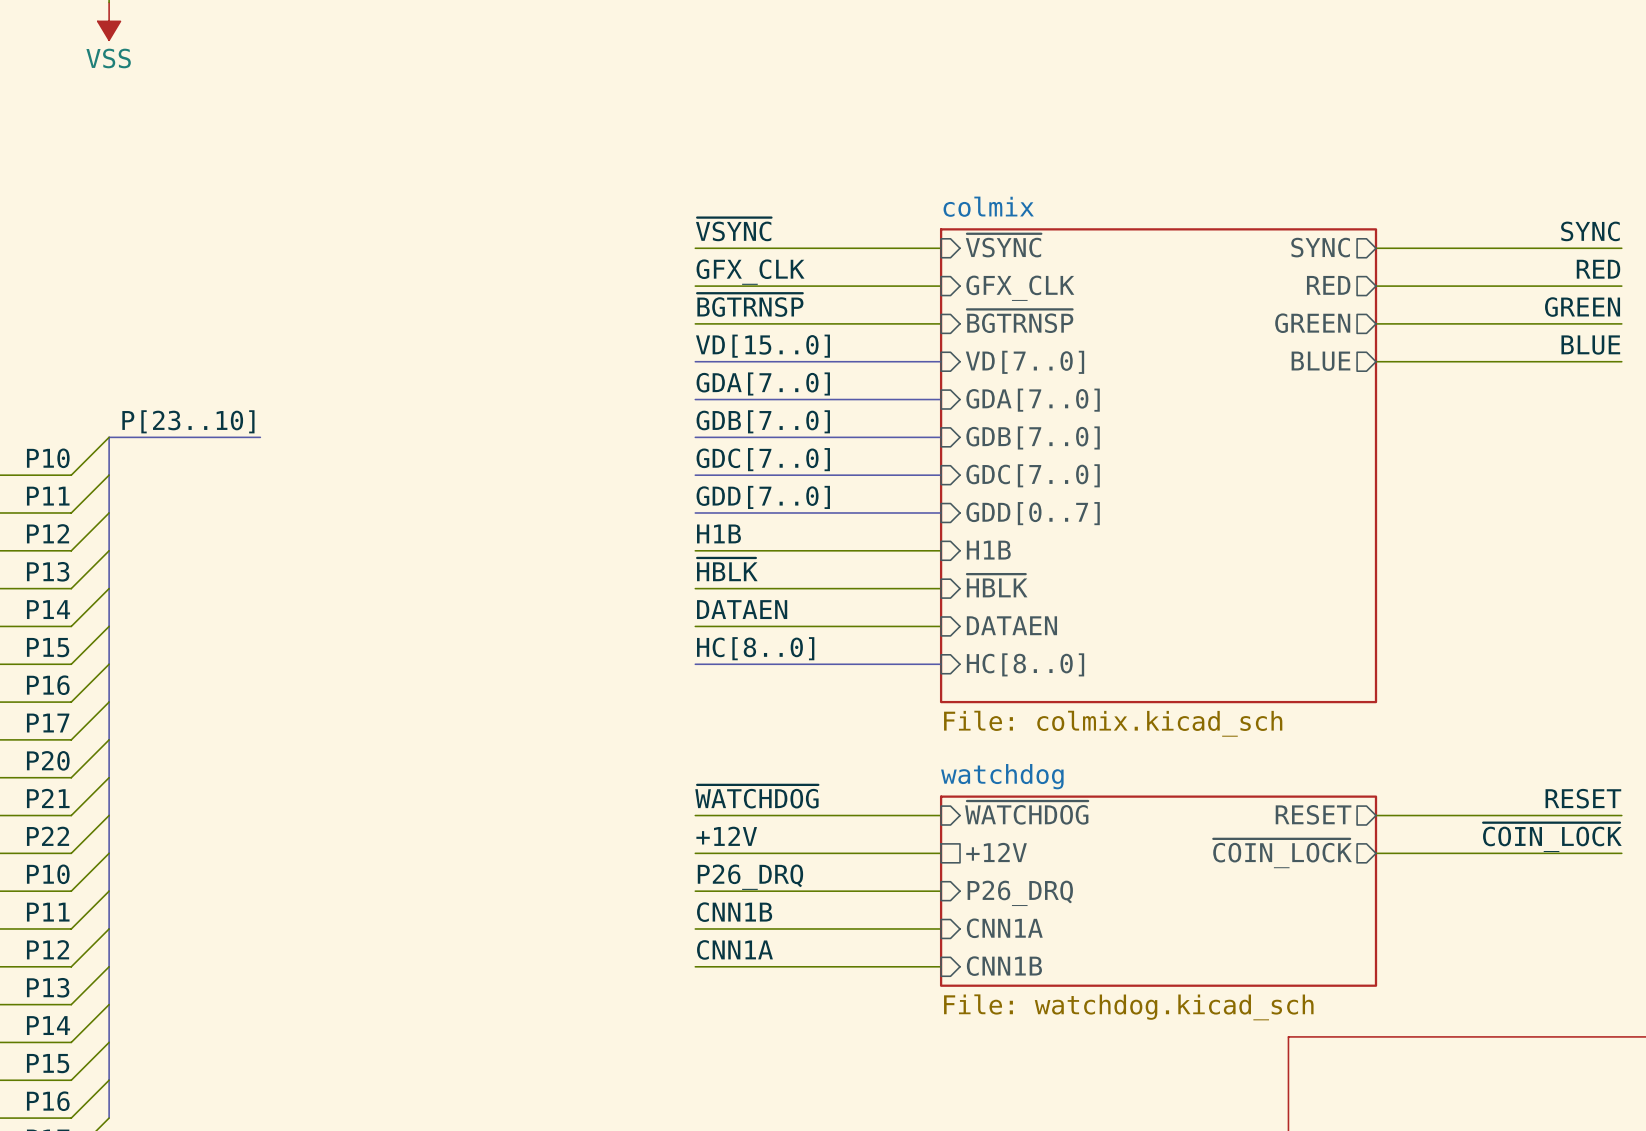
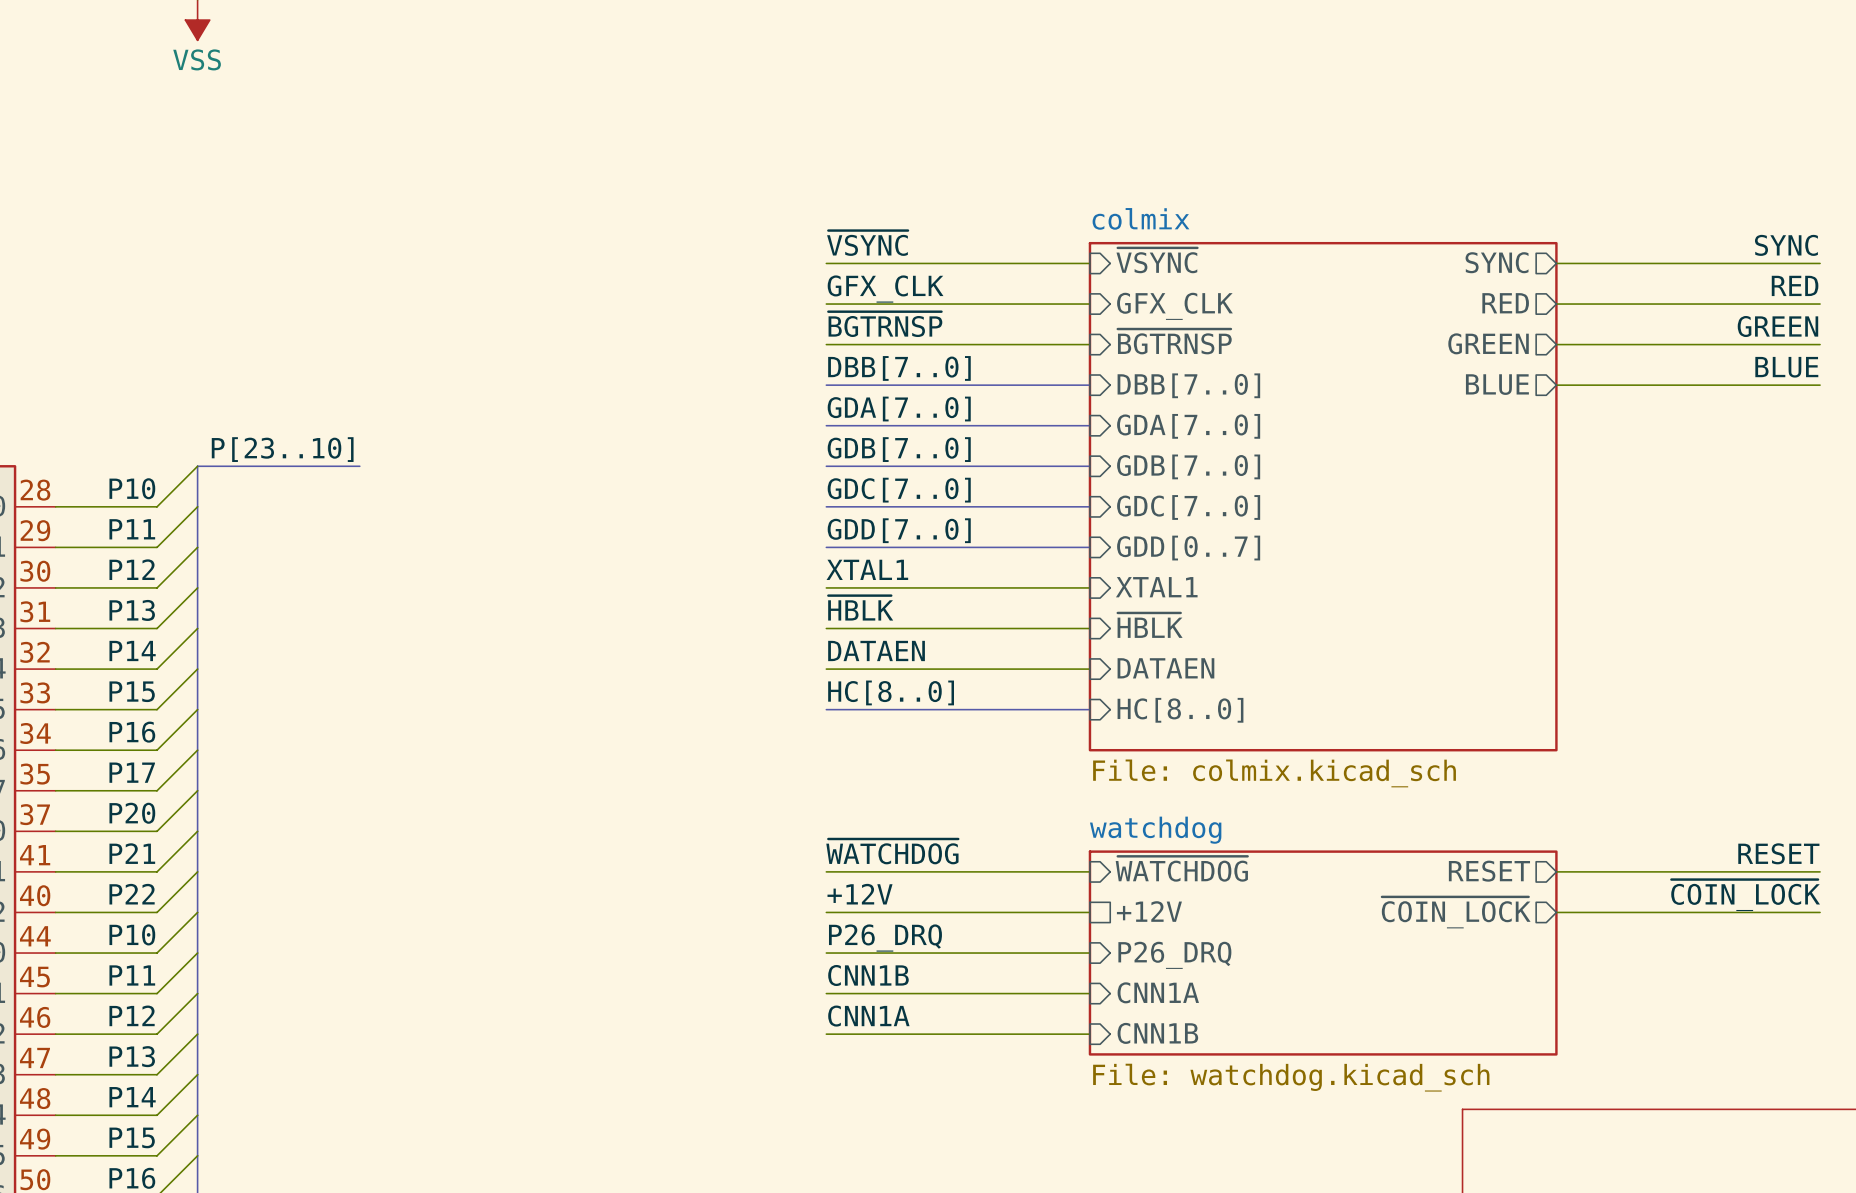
label: VD[15..0] (762, 346) -> DBB[7..0] (899, 368)
sheet pin: VD[7..0] (1025, 362) -> DBB[7..0] (1188, 385)
label: H1B (718, 533) -> XTAL1 (867, 569)
sheet pin: H1B (988, 550) -> XTAL1 (1156, 587)

